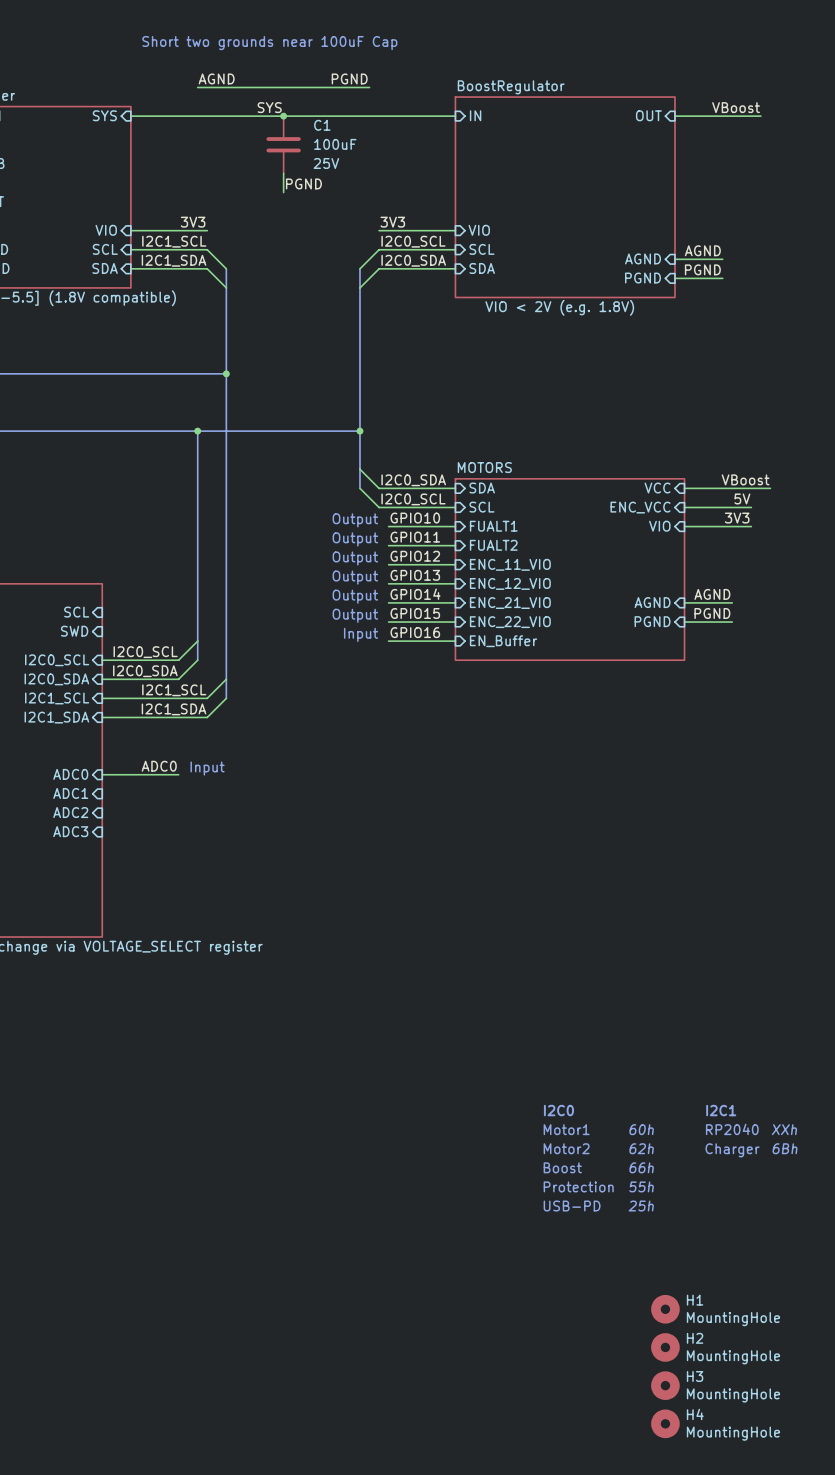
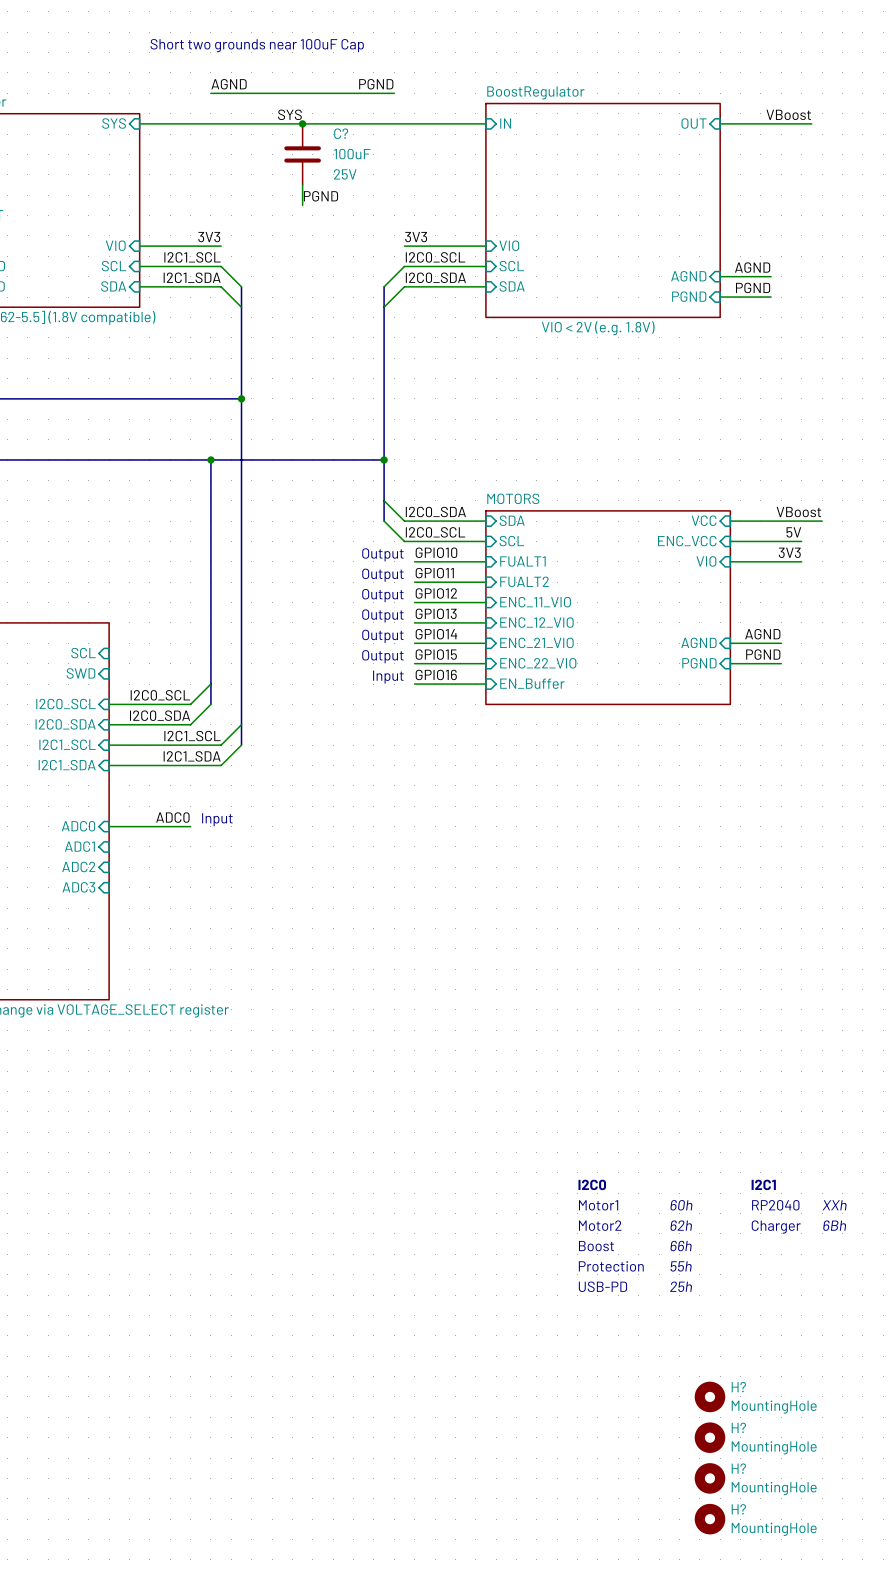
C1 name: C1 (322, 125) -> C? (341, 133)
H1 name: H1 (695, 1300) -> H? (738, 1387)
H2 name: H2 (695, 1338) -> H? (738, 1427)
H3 name: H3 (695, 1376) -> H? (738, 1468)
H4 name: H4 (695, 1414) -> H? (738, 1509)

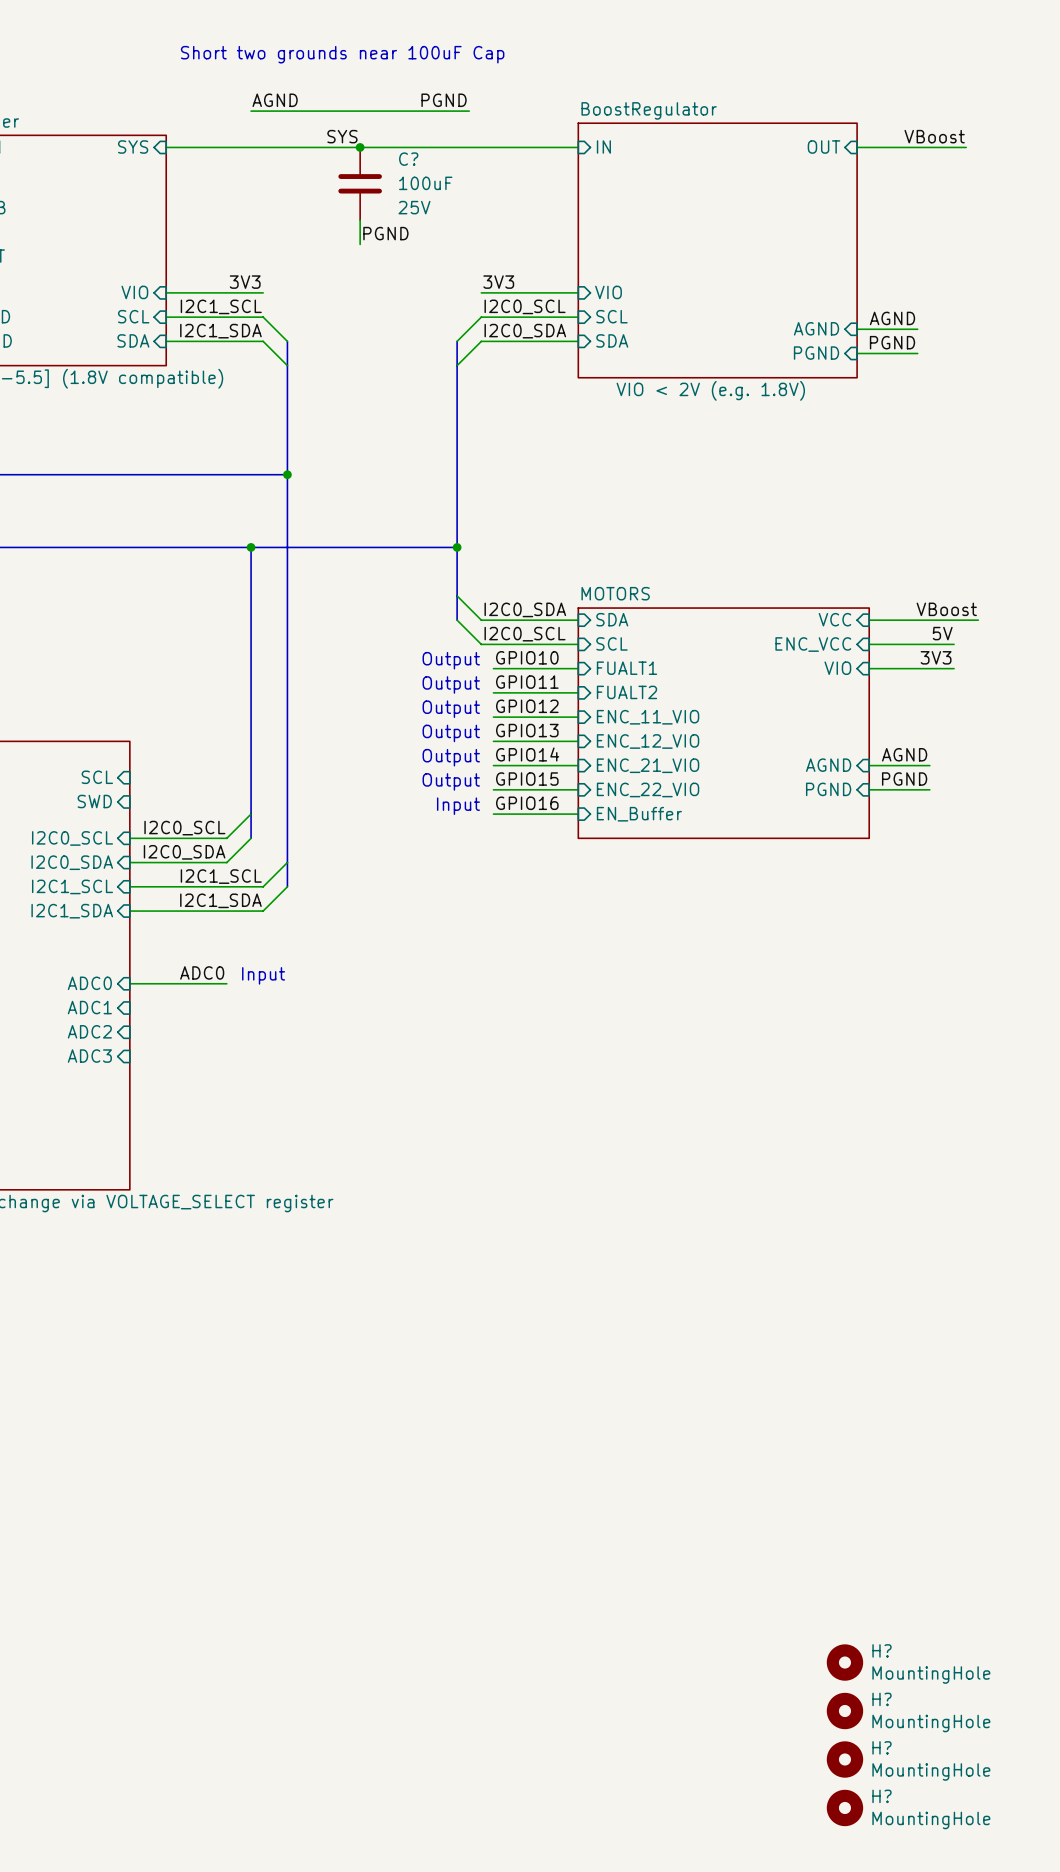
text: I2C0 (592, 1184) -> none
text: I2C1 (763, 1184) -> none
text: Motor1 (598, 1205) -> none
text: 60h (681, 1205) -> none
text: RP2040 (775, 1205) -> none
text: XXh (834, 1205) -> none
text: Motor2 (600, 1225) -> none
text: 62h (681, 1225) -> none
text: 6Bh (834, 1225) -> none
text: Charger (776, 1227) -> none
text: Boost (596, 1246) -> none
text: 66h (681, 1246) -> none
text: Protection (611, 1266) -> none
text: 55h (681, 1266) -> none
text: USB-PD (602, 1286) -> none
text: 25h (681, 1286) -> none

